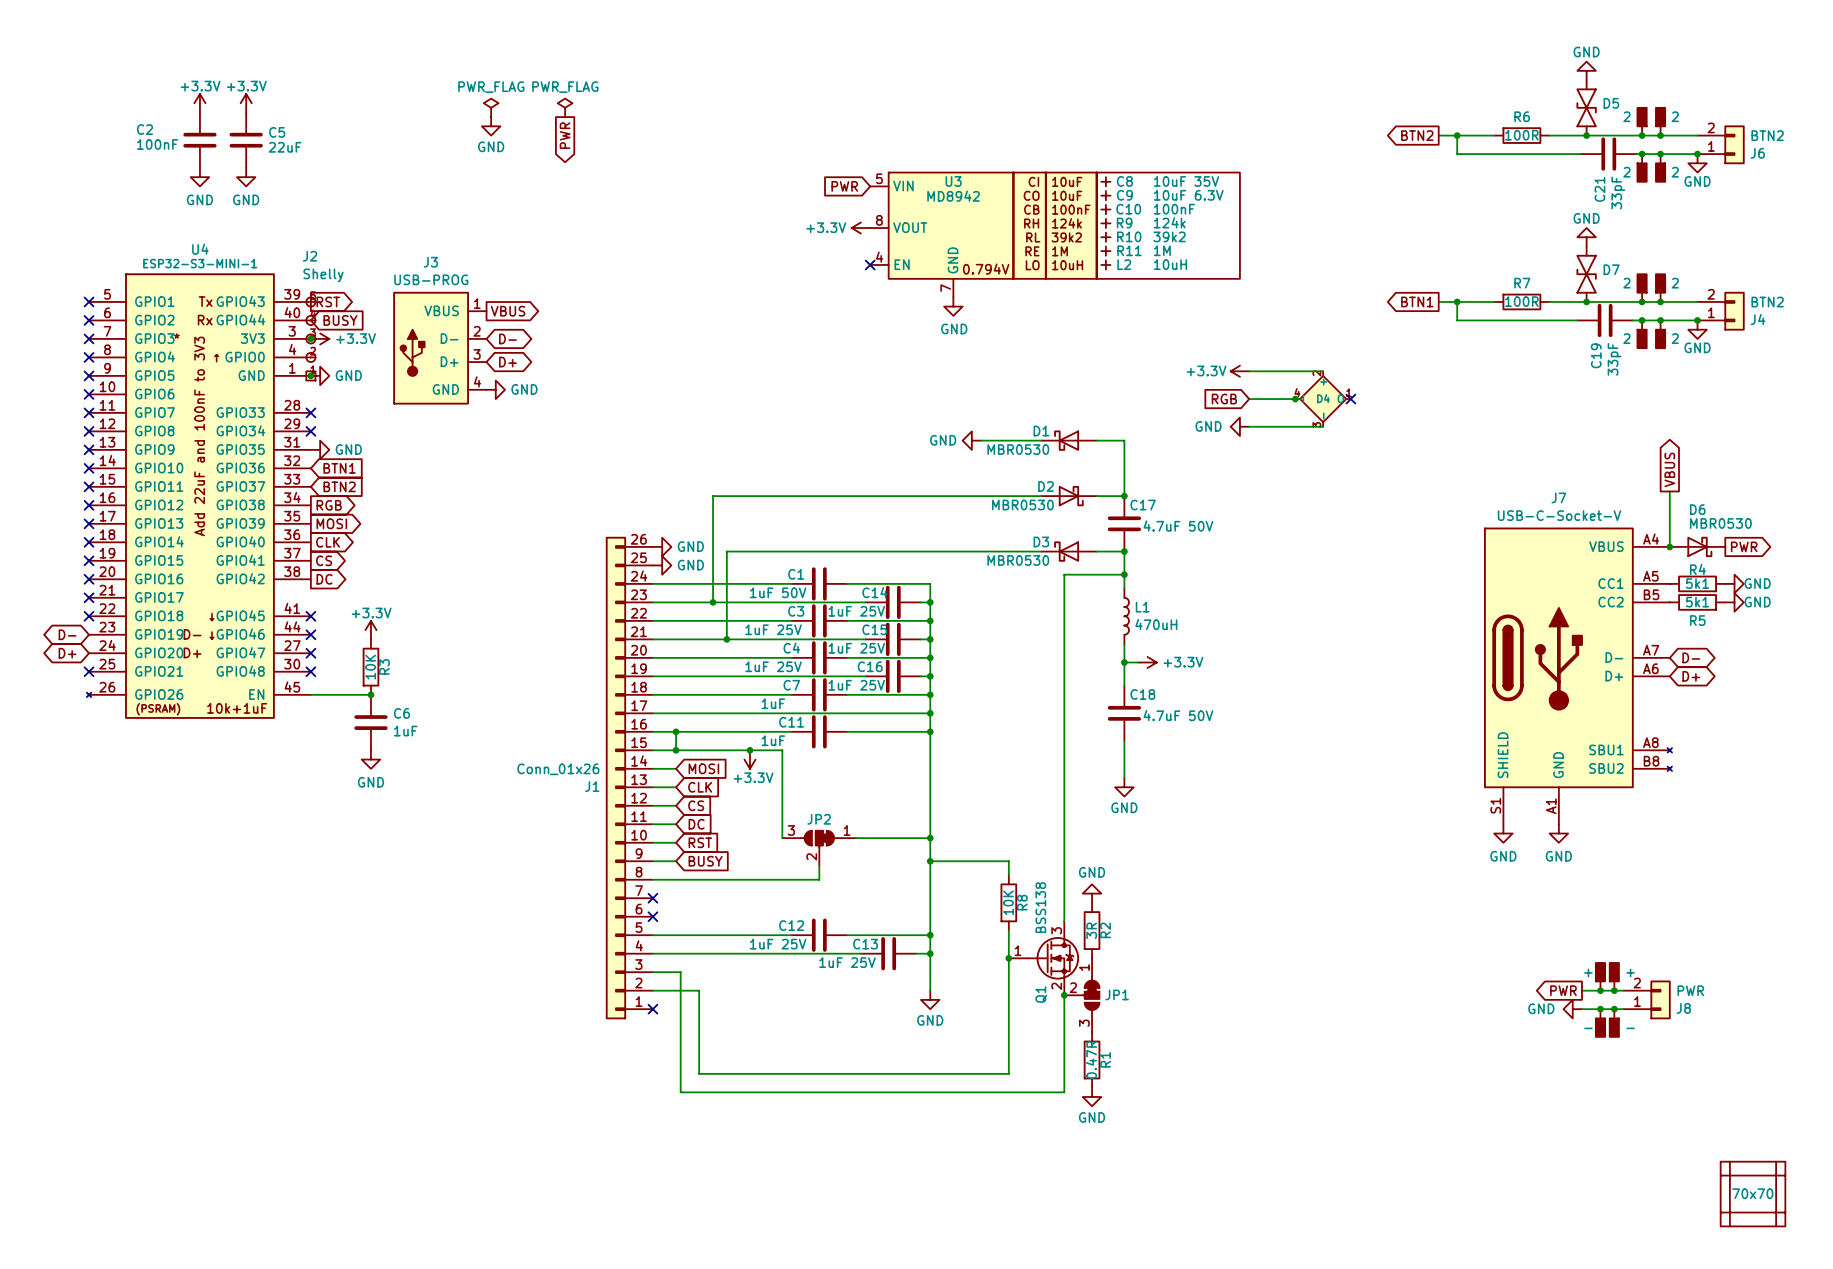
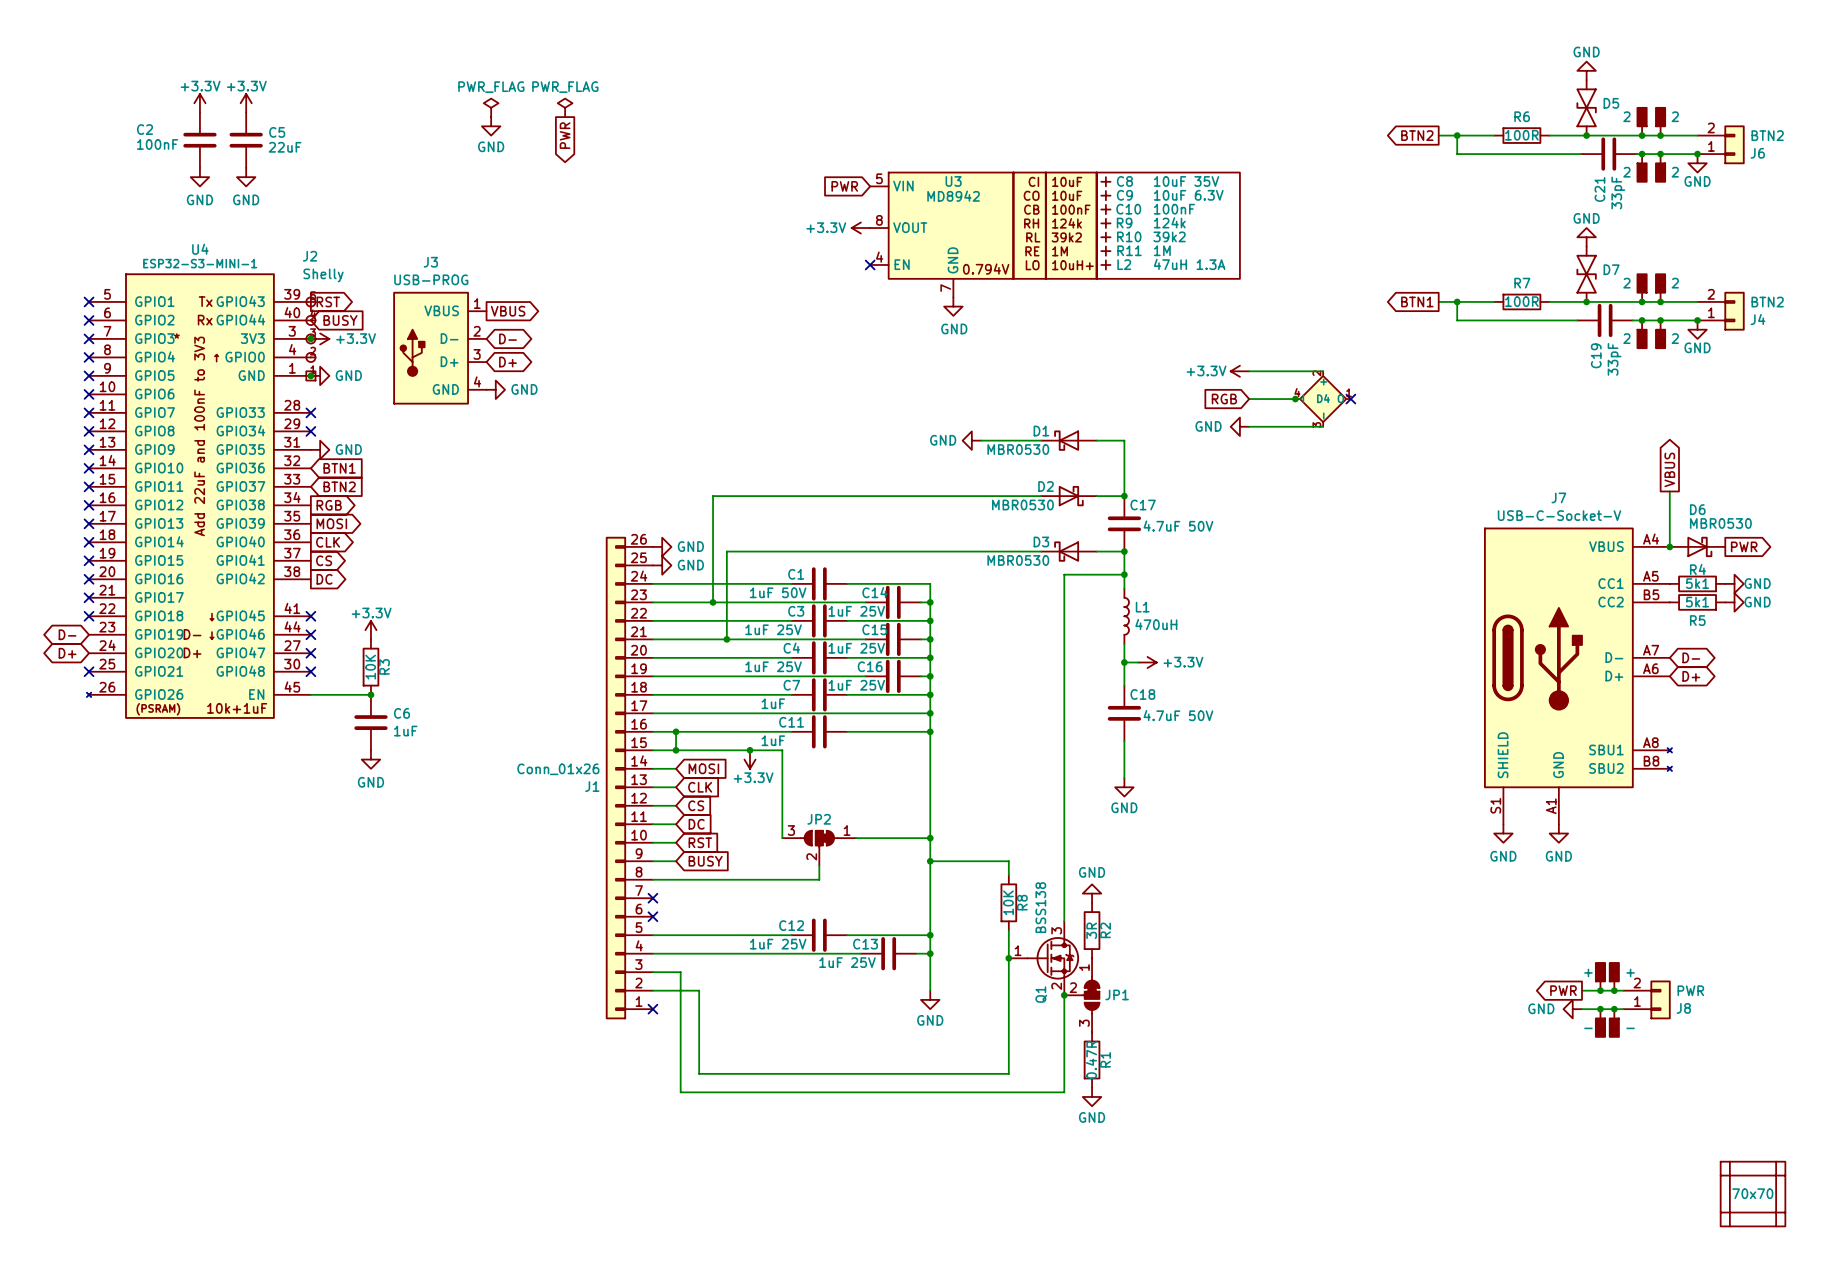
L2 value: 10uH (1170, 264) -> 47uH 1.3A (1189, 264)
U3 text: 10uH (1067, 265) -> 10uH+ (1072, 265)

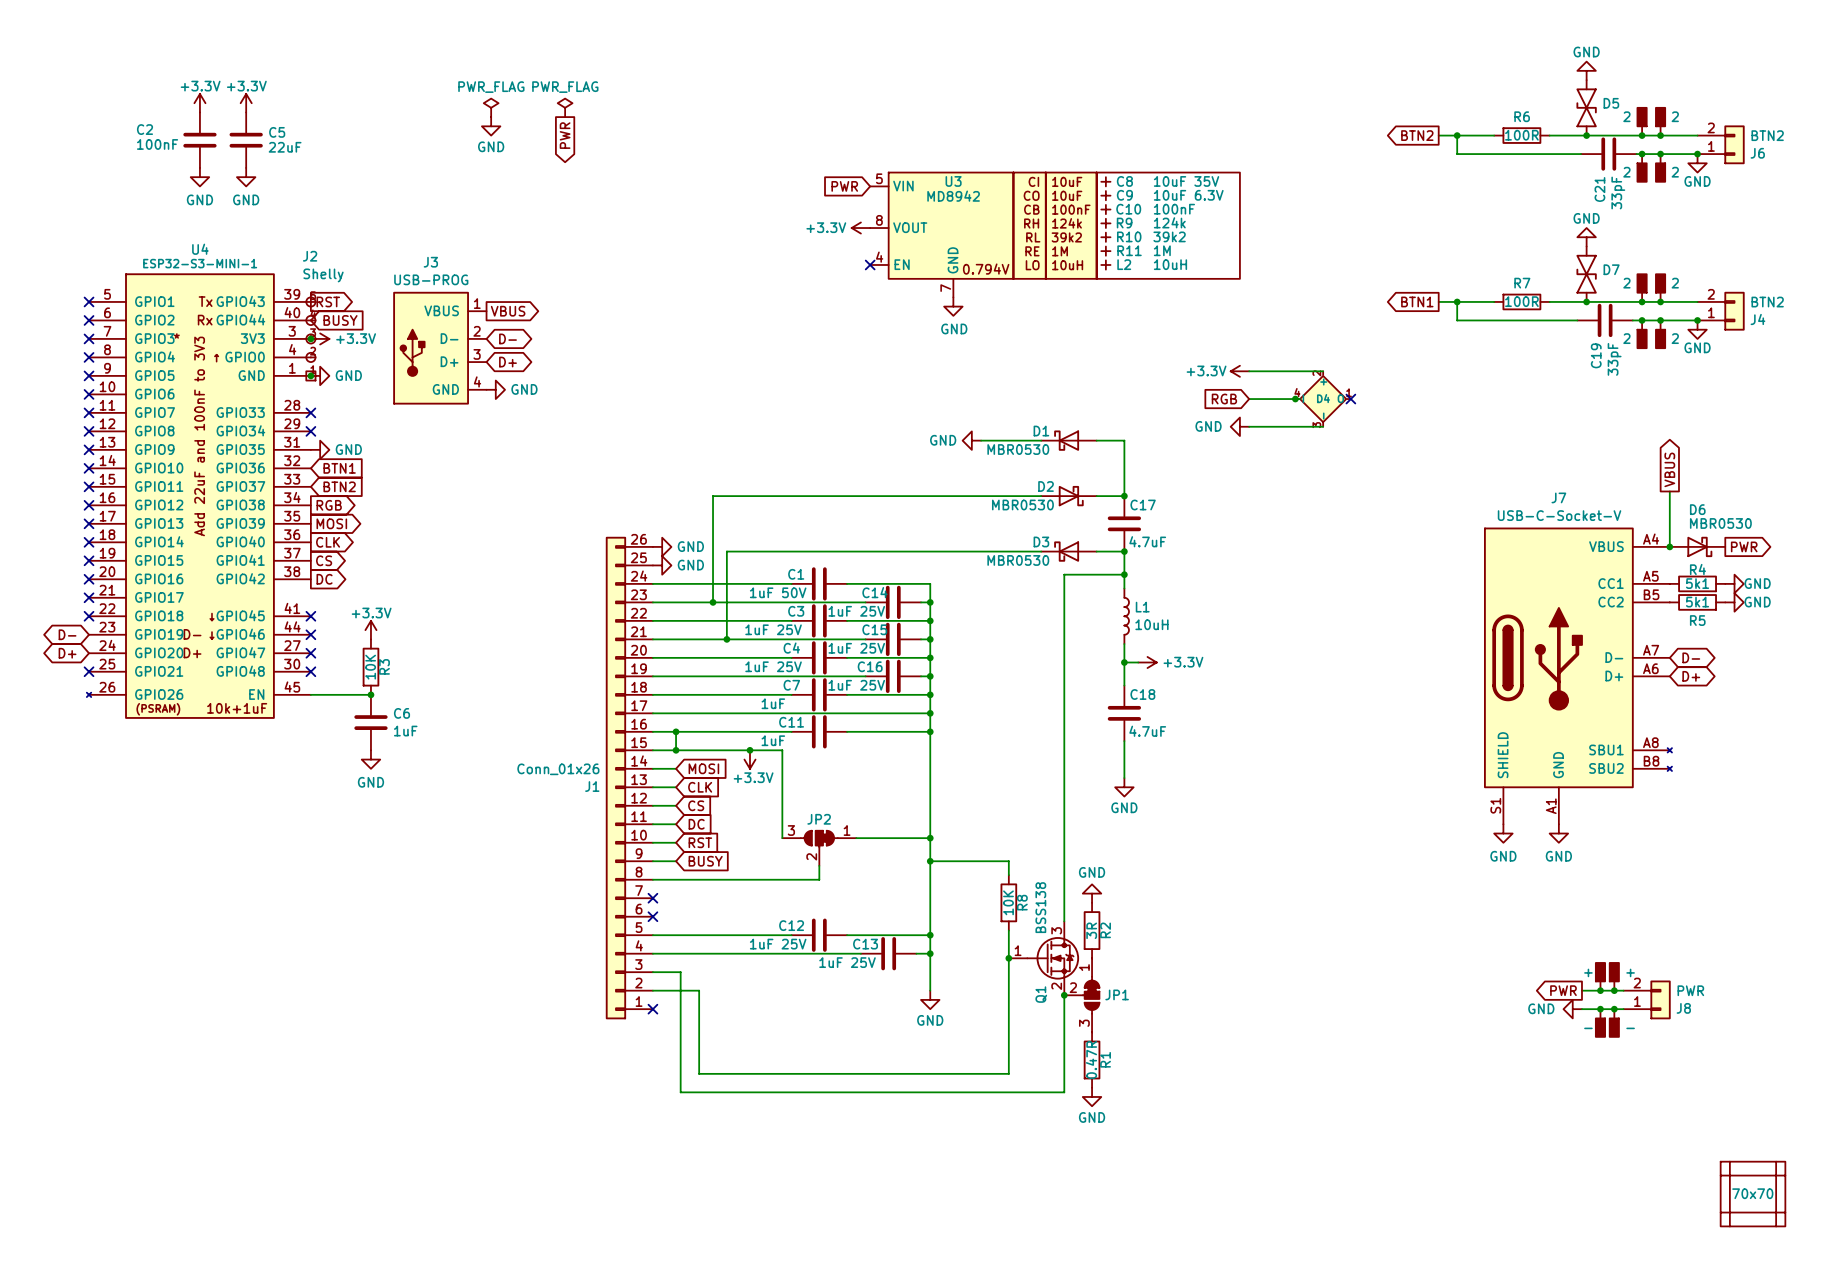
L2 value: 47uH 1.3A (1189, 264) -> 10uH (1170, 264)
U3 text: 10uH+ (1072, 265) -> 10uH (1067, 265)
C17 value: 4.7uF 50V (1178, 526) -> 4.7uF (1147, 541)
L1 value: 470uH (1156, 624) -> 10uH (1151, 624)
C18 value: 4.7uF 50V (1178, 715) -> 4.7uF (1147, 731)

